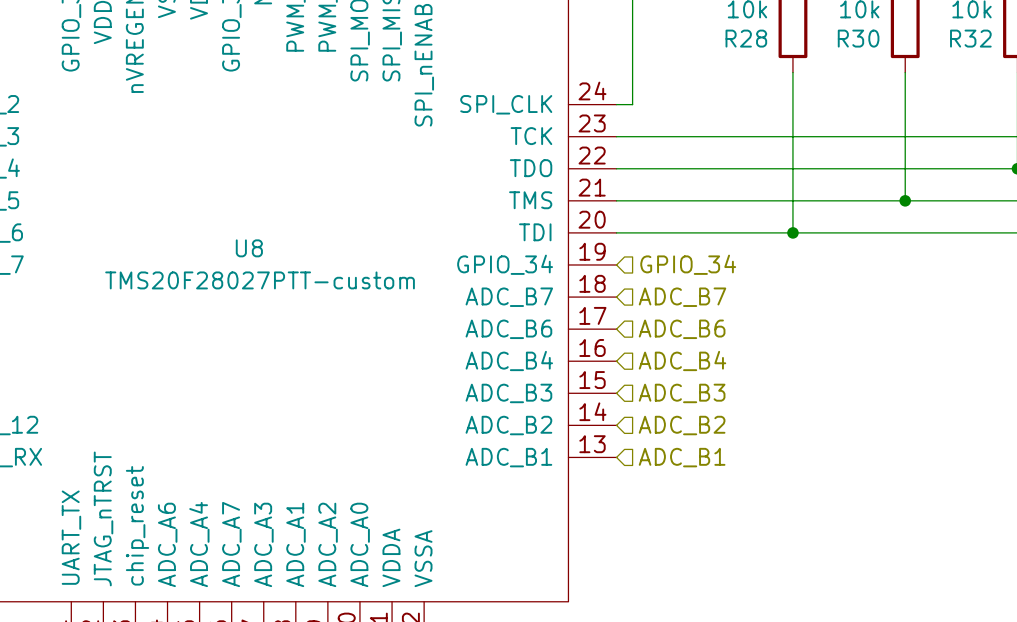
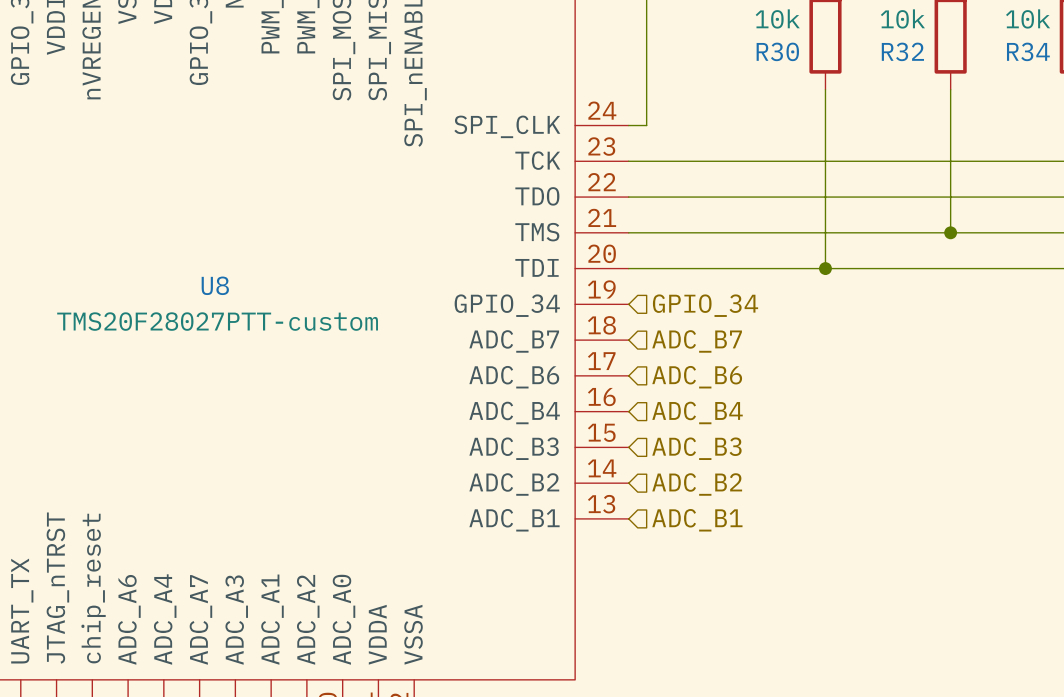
R28 name: R28 (746, 38) -> R30 (777, 51)
R30 name: R30 (858, 38) -> R32 (902, 51)
R32 name: R32 (970, 38) -> R34 (1028, 51)

